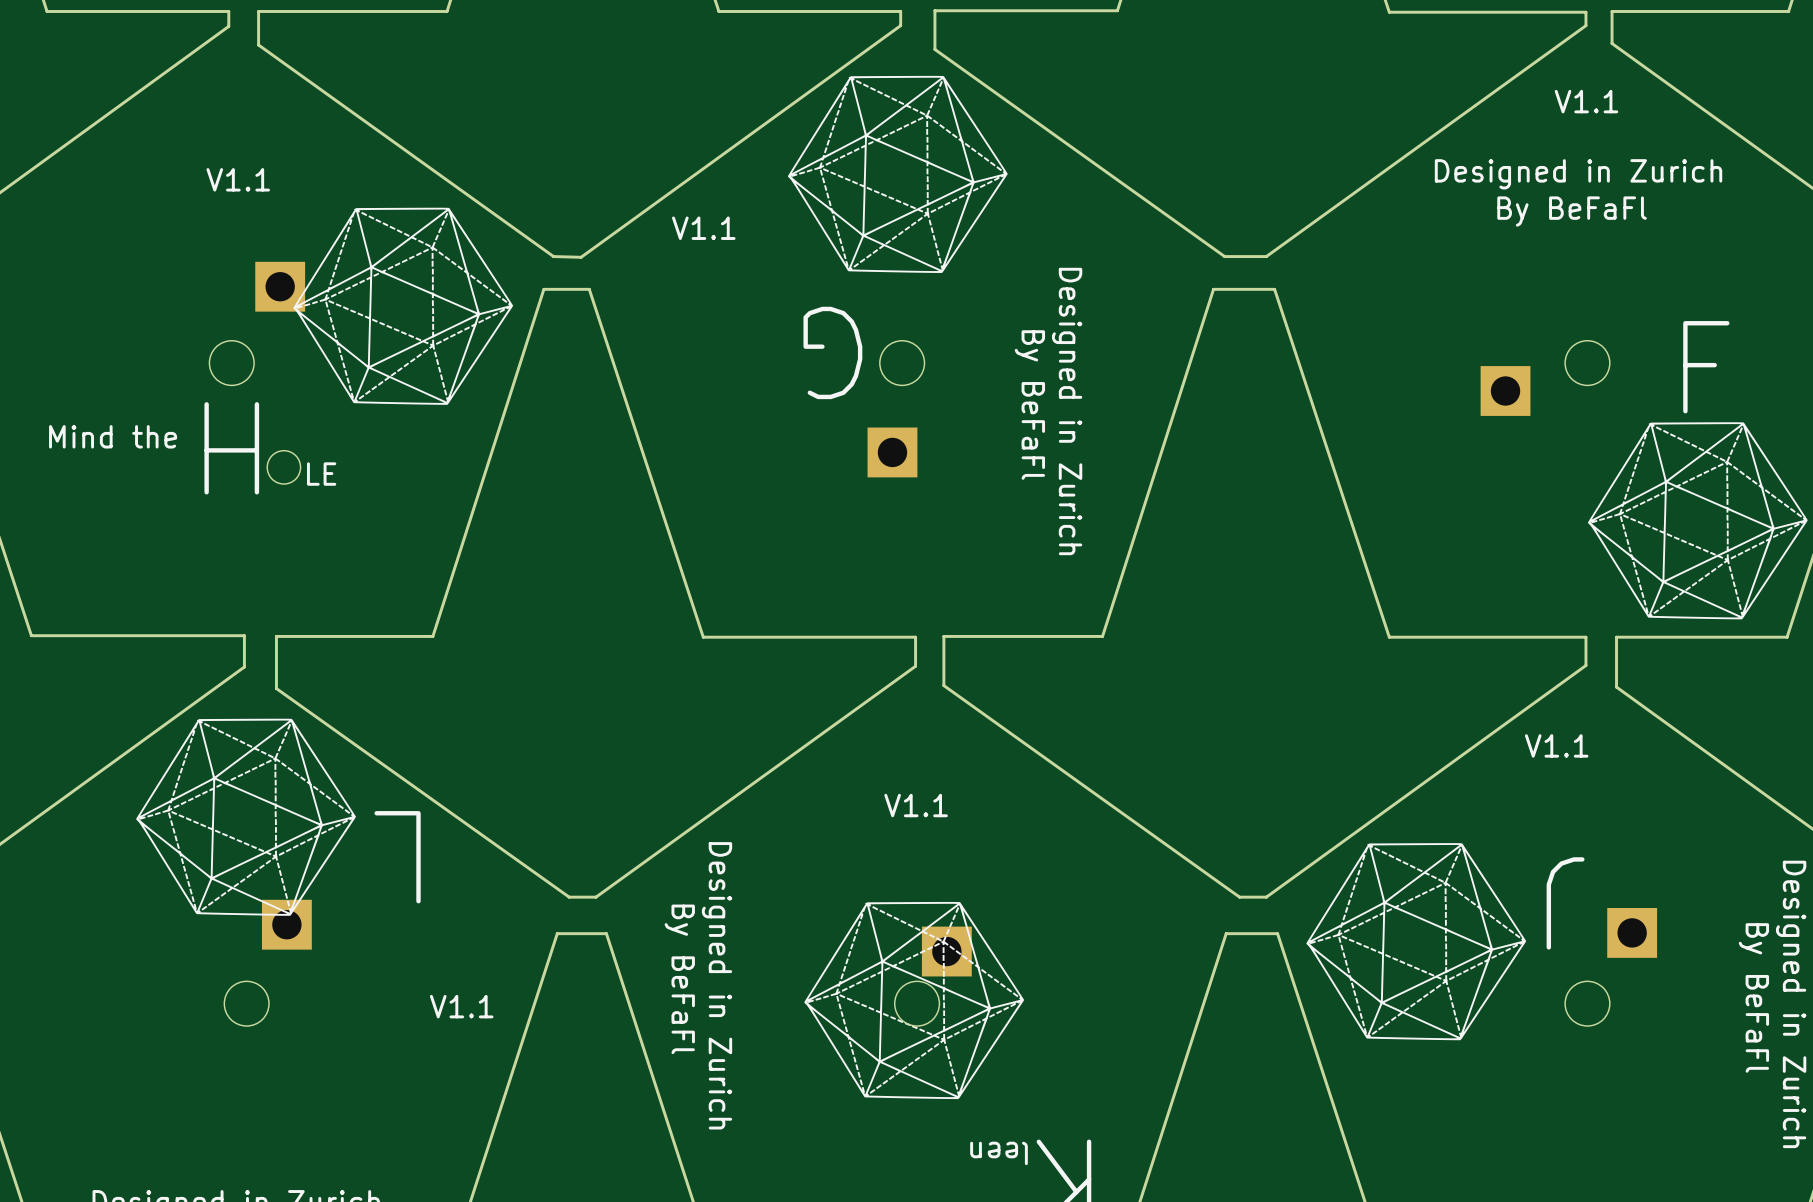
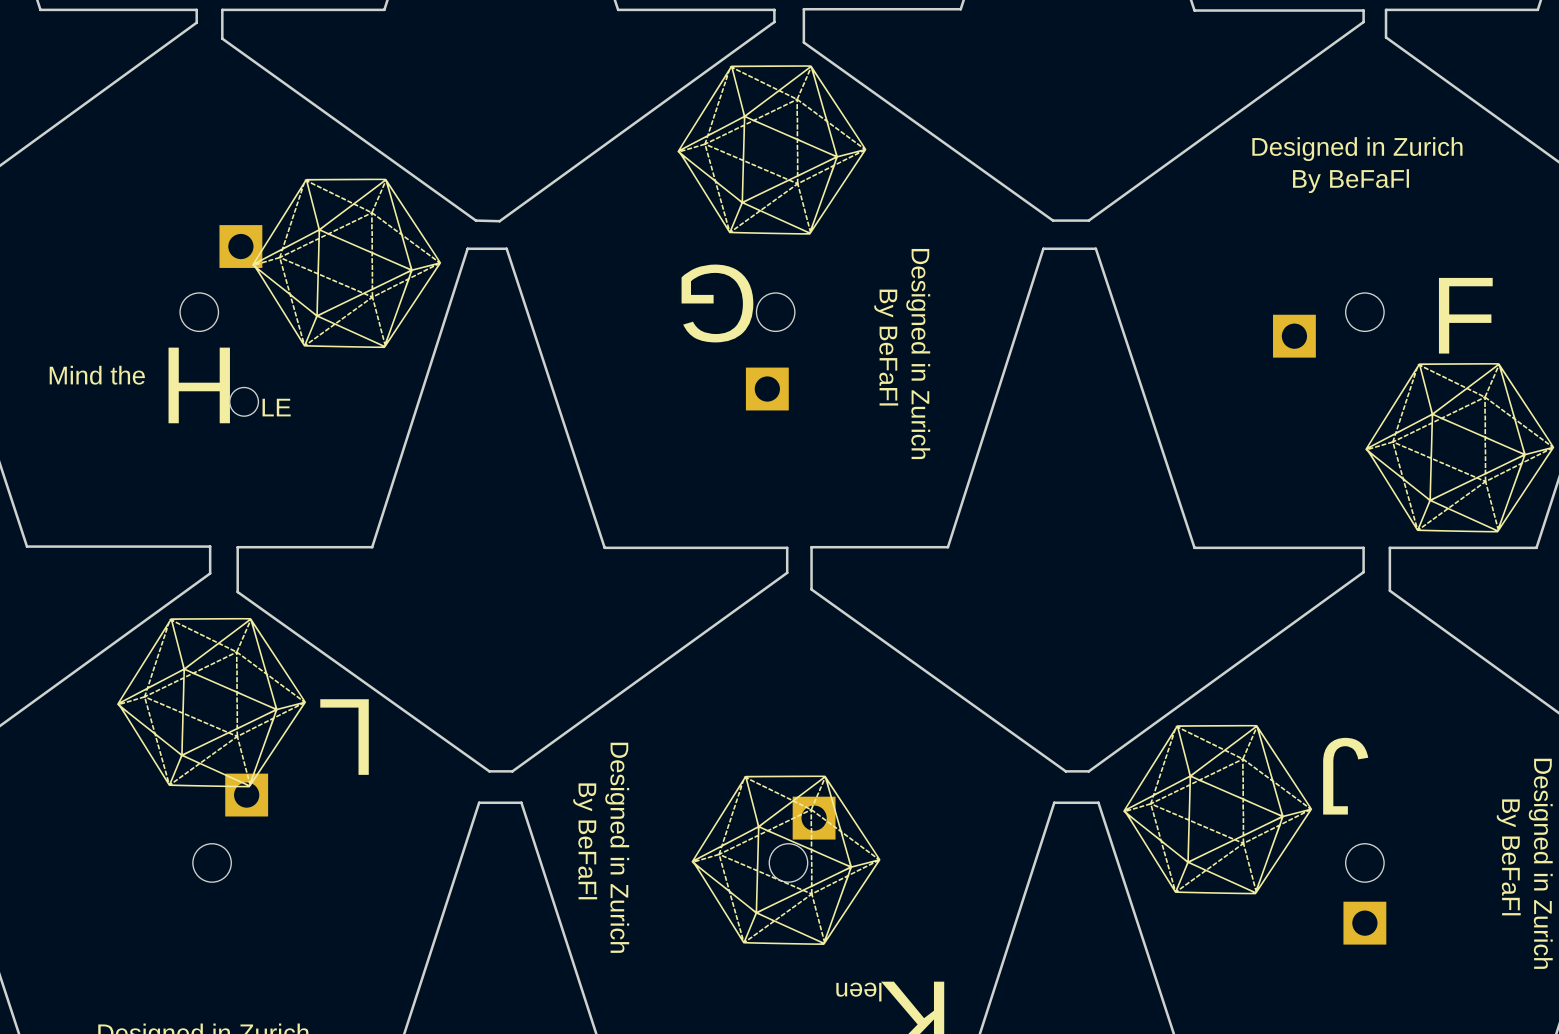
text: V1.1 (1586, 101) -> none
text: V1.1 (238, 179) -> none
text: V1.1 (703, 228) -> none
text: V1.1 (1556, 745) -> none
text: V1.1 (916, 805) -> none
part position: (1632, 932) -> (1364, 923)
text: V1.1 (461, 1006) -> none

